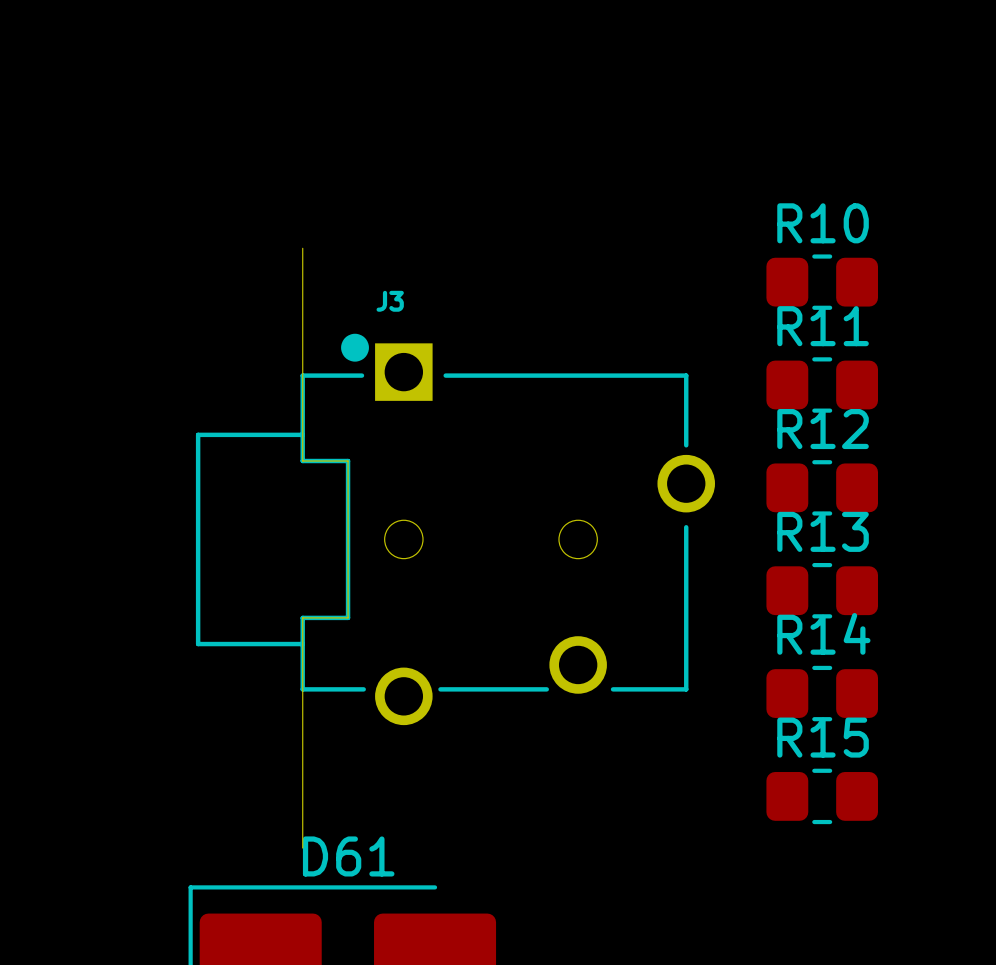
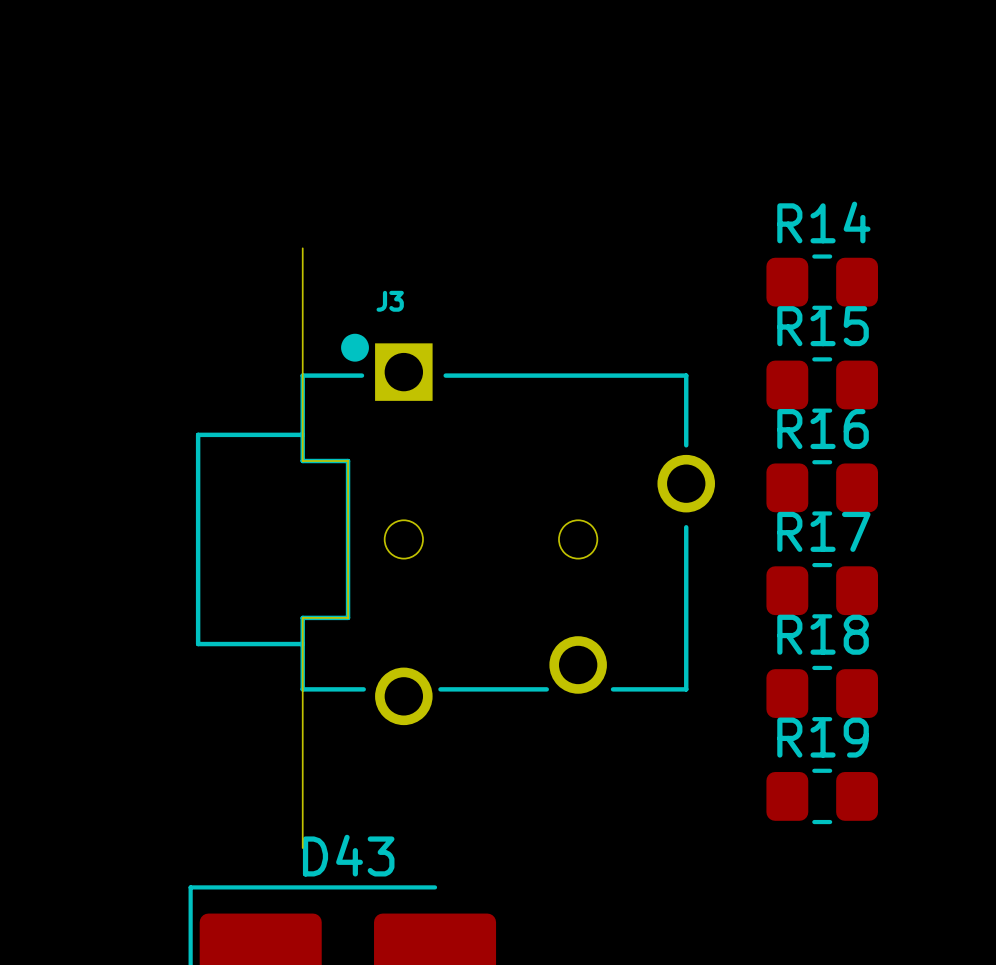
R10 name: R10 (823, 223) -> R14 (823, 222)
R11 name: R11 (823, 326) -> R15 (823, 326)
R12 name: R12 (823, 429) -> R16 (823, 429)
R13 name: R13 (823, 531) -> R17 (823, 531)
R14 name: R14 (823, 633) -> R18 (823, 634)
R15 name: R15 (823, 737) -> R19 (823, 737)
D61 name: D61 (348, 856) -> D43 (348, 855)

